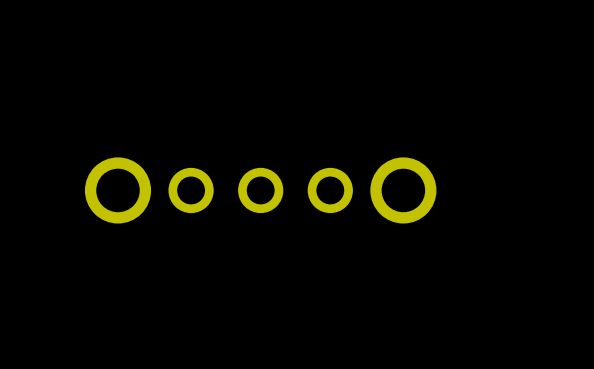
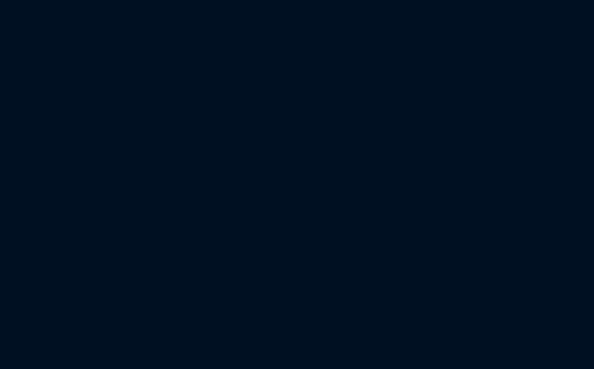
part: (260, 190) -> none

